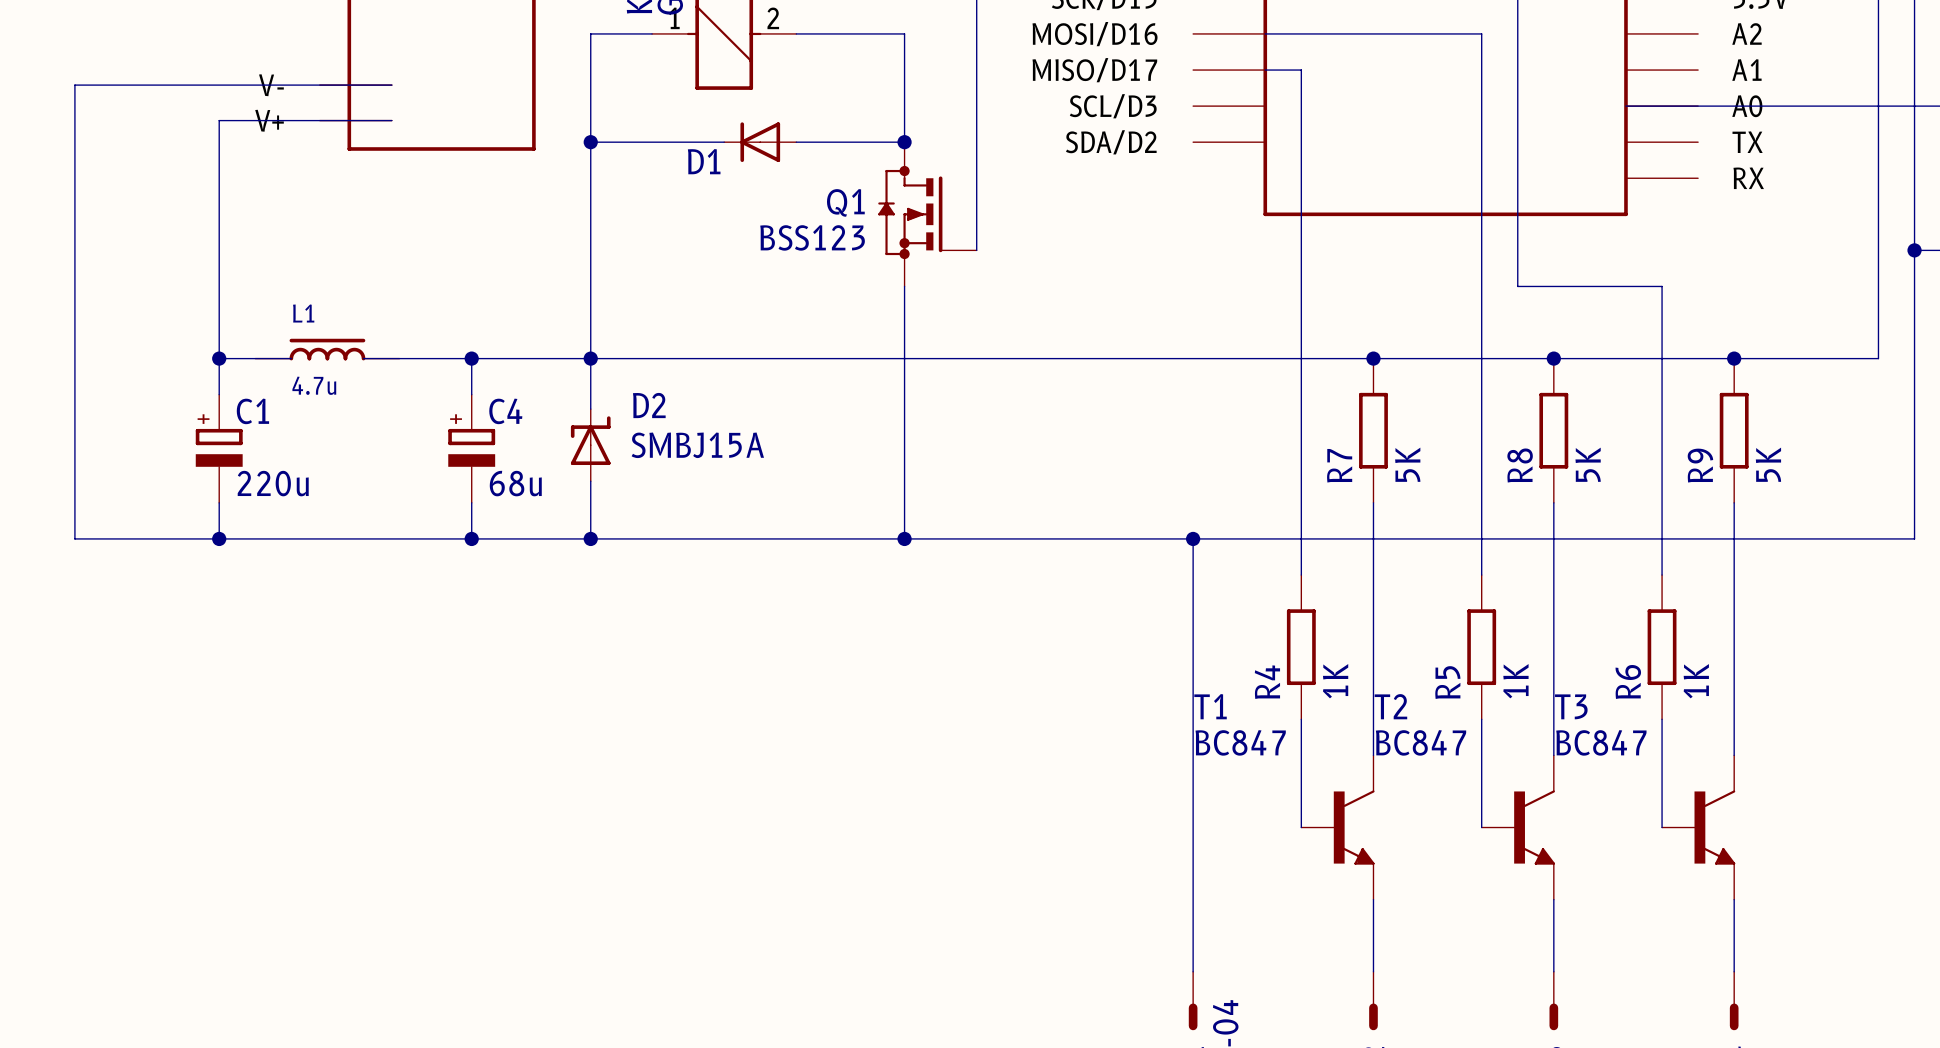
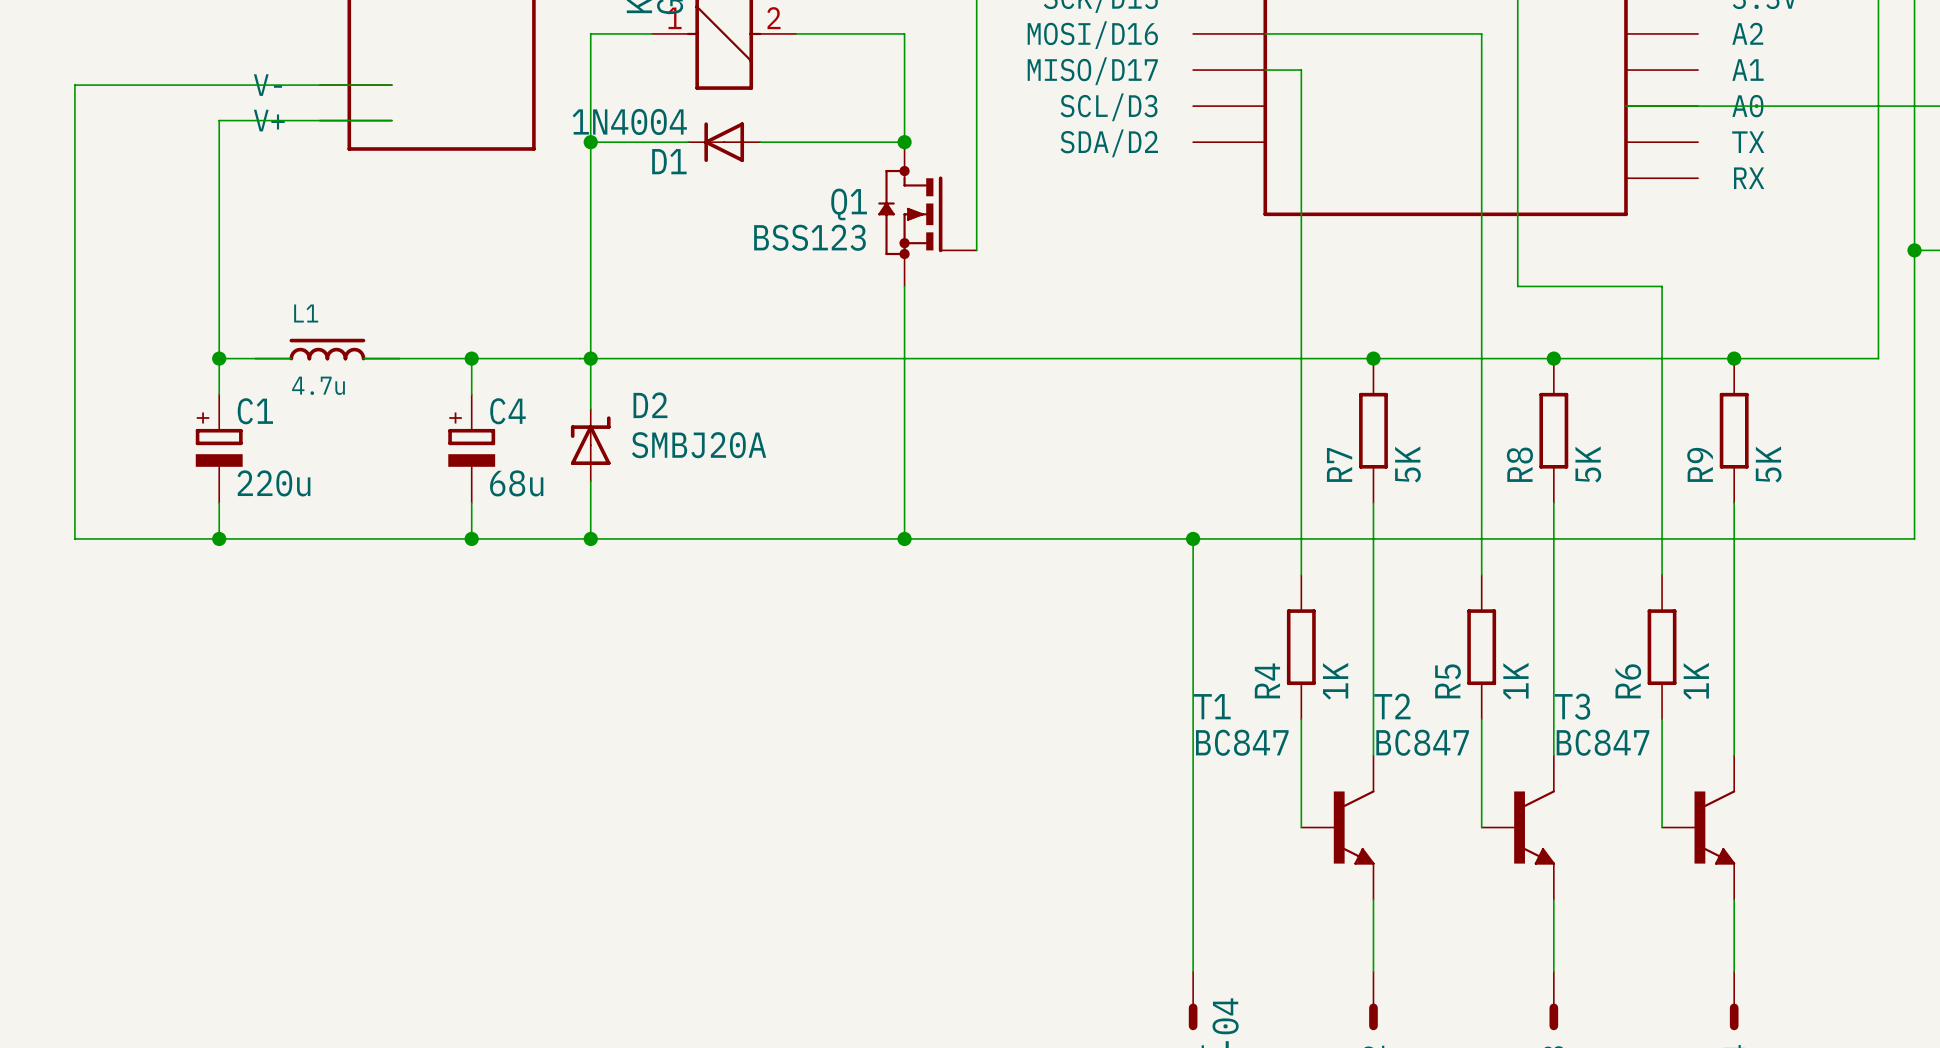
D1 value: none -> 1N4004 (629, 121)
D1 position: (760, 142) -> (724, 142)
D2 value: SMBJ15A (697, 445) -> SMBJ20A (699, 445)

